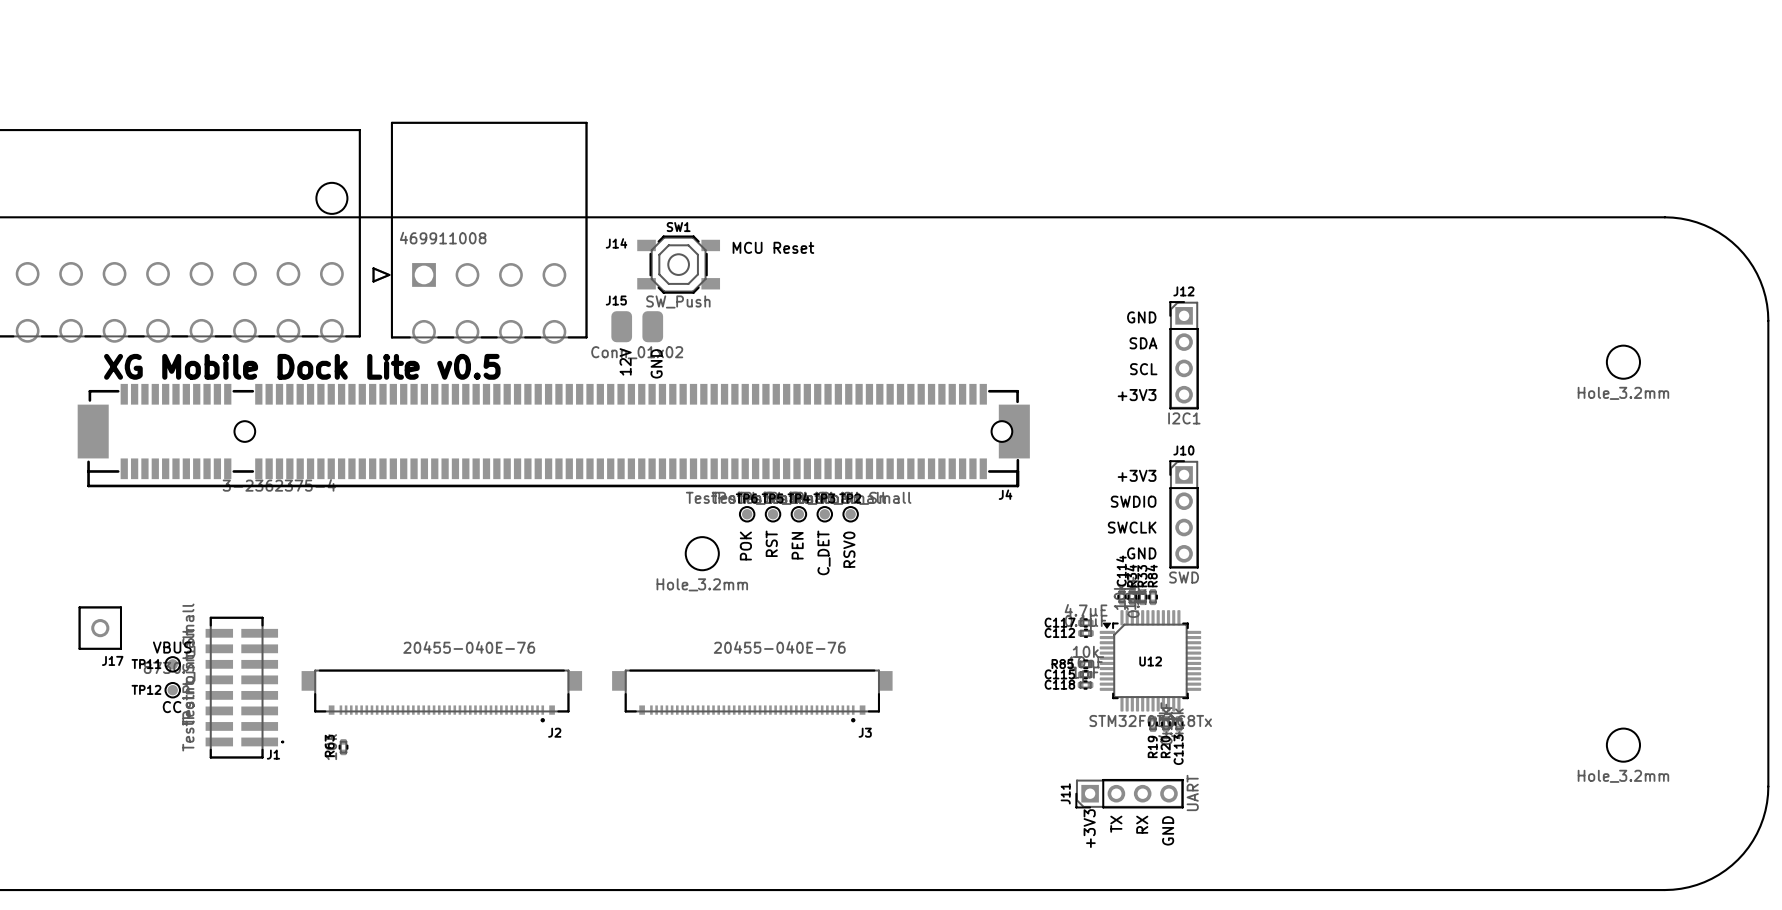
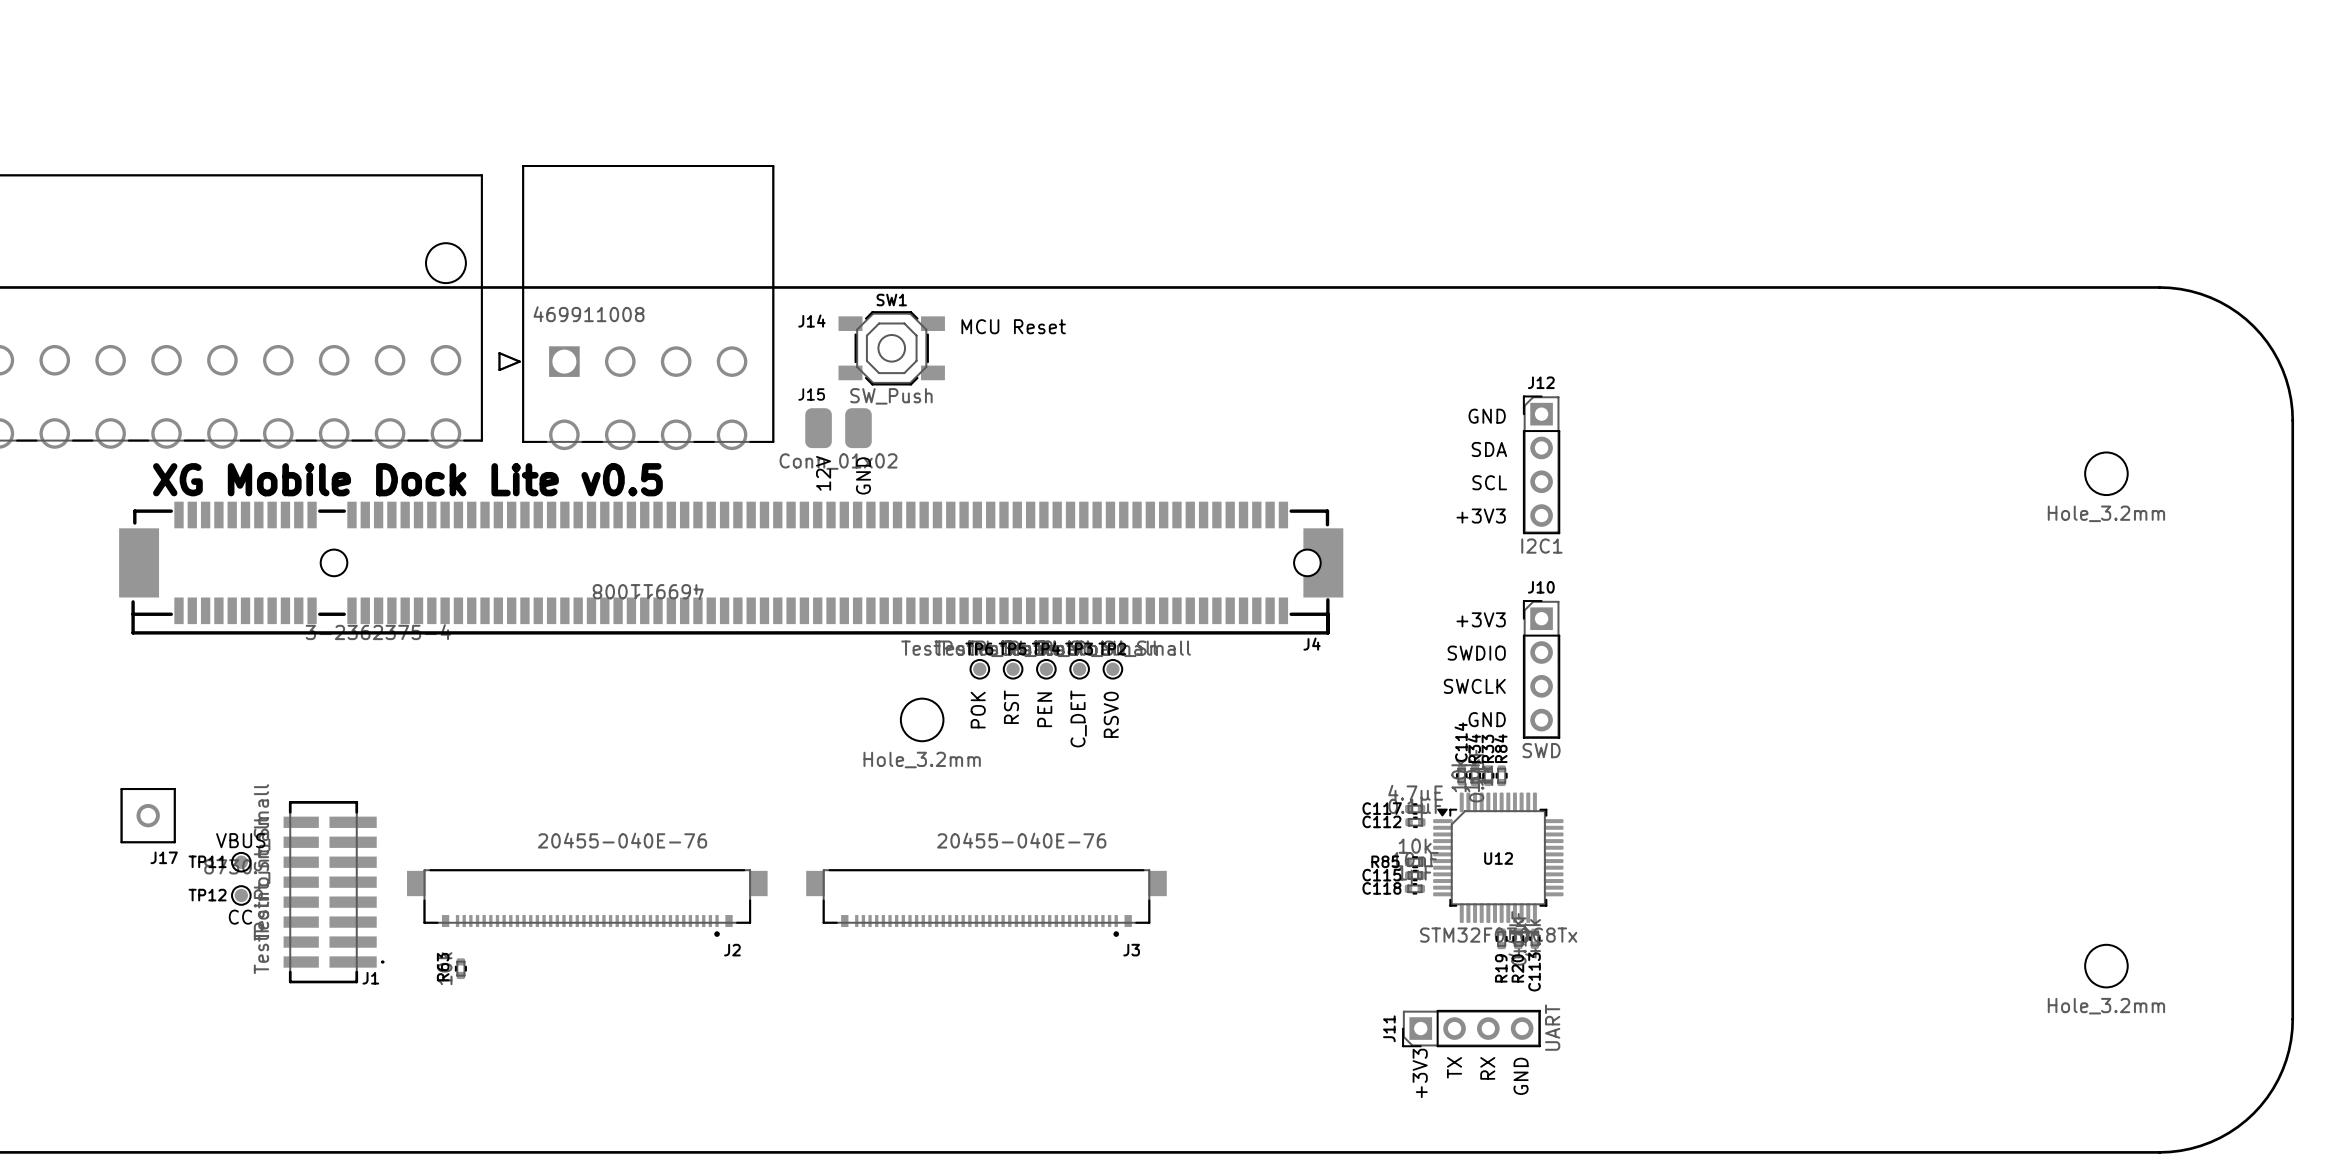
J14 text: none -> 469911008 (648, 592)

